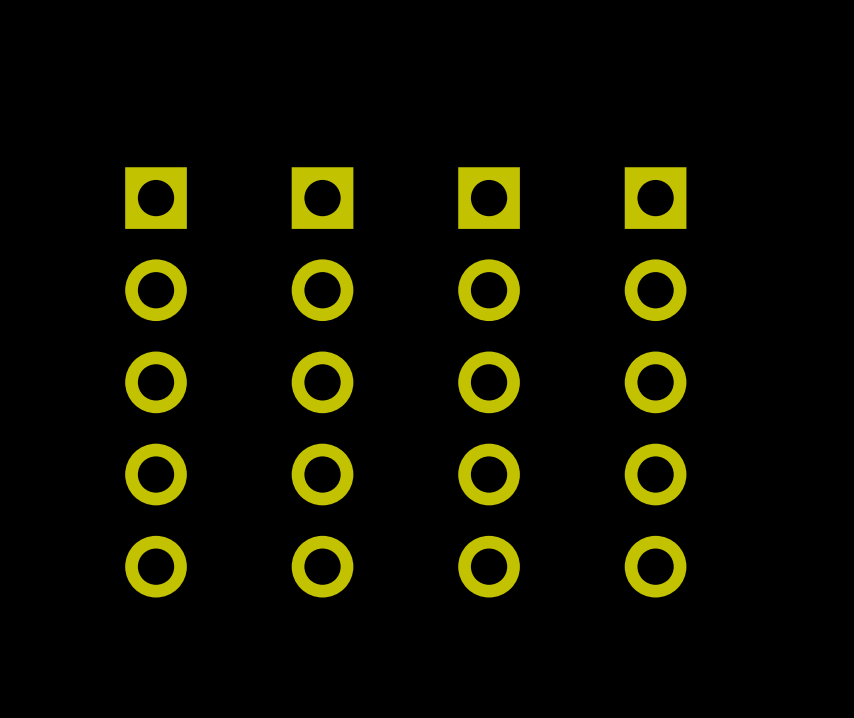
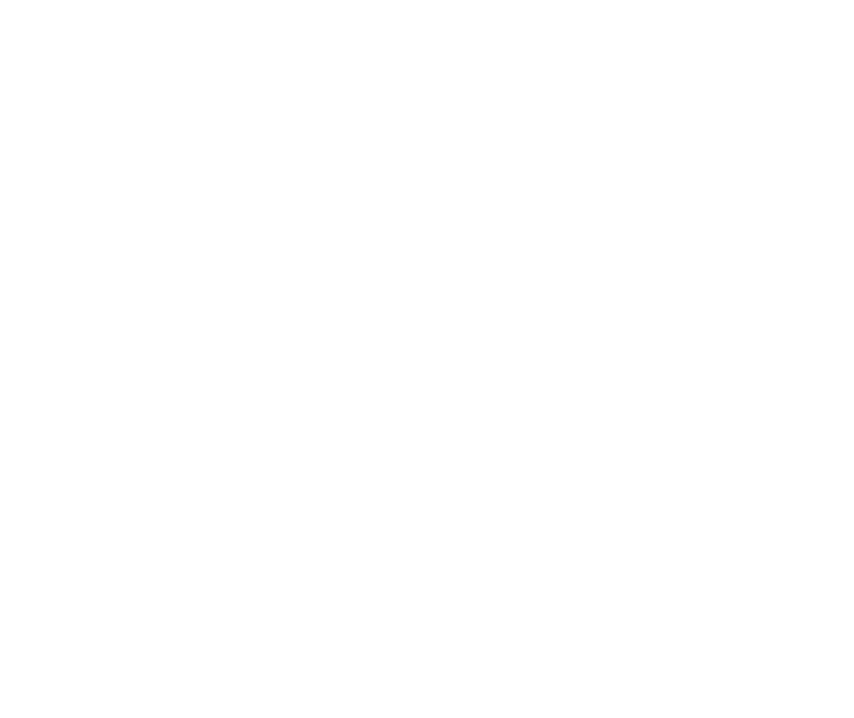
part: (156, 382) -> none
part: (322, 382) -> none
part: (489, 382) -> none
part: (655, 382) -> none

